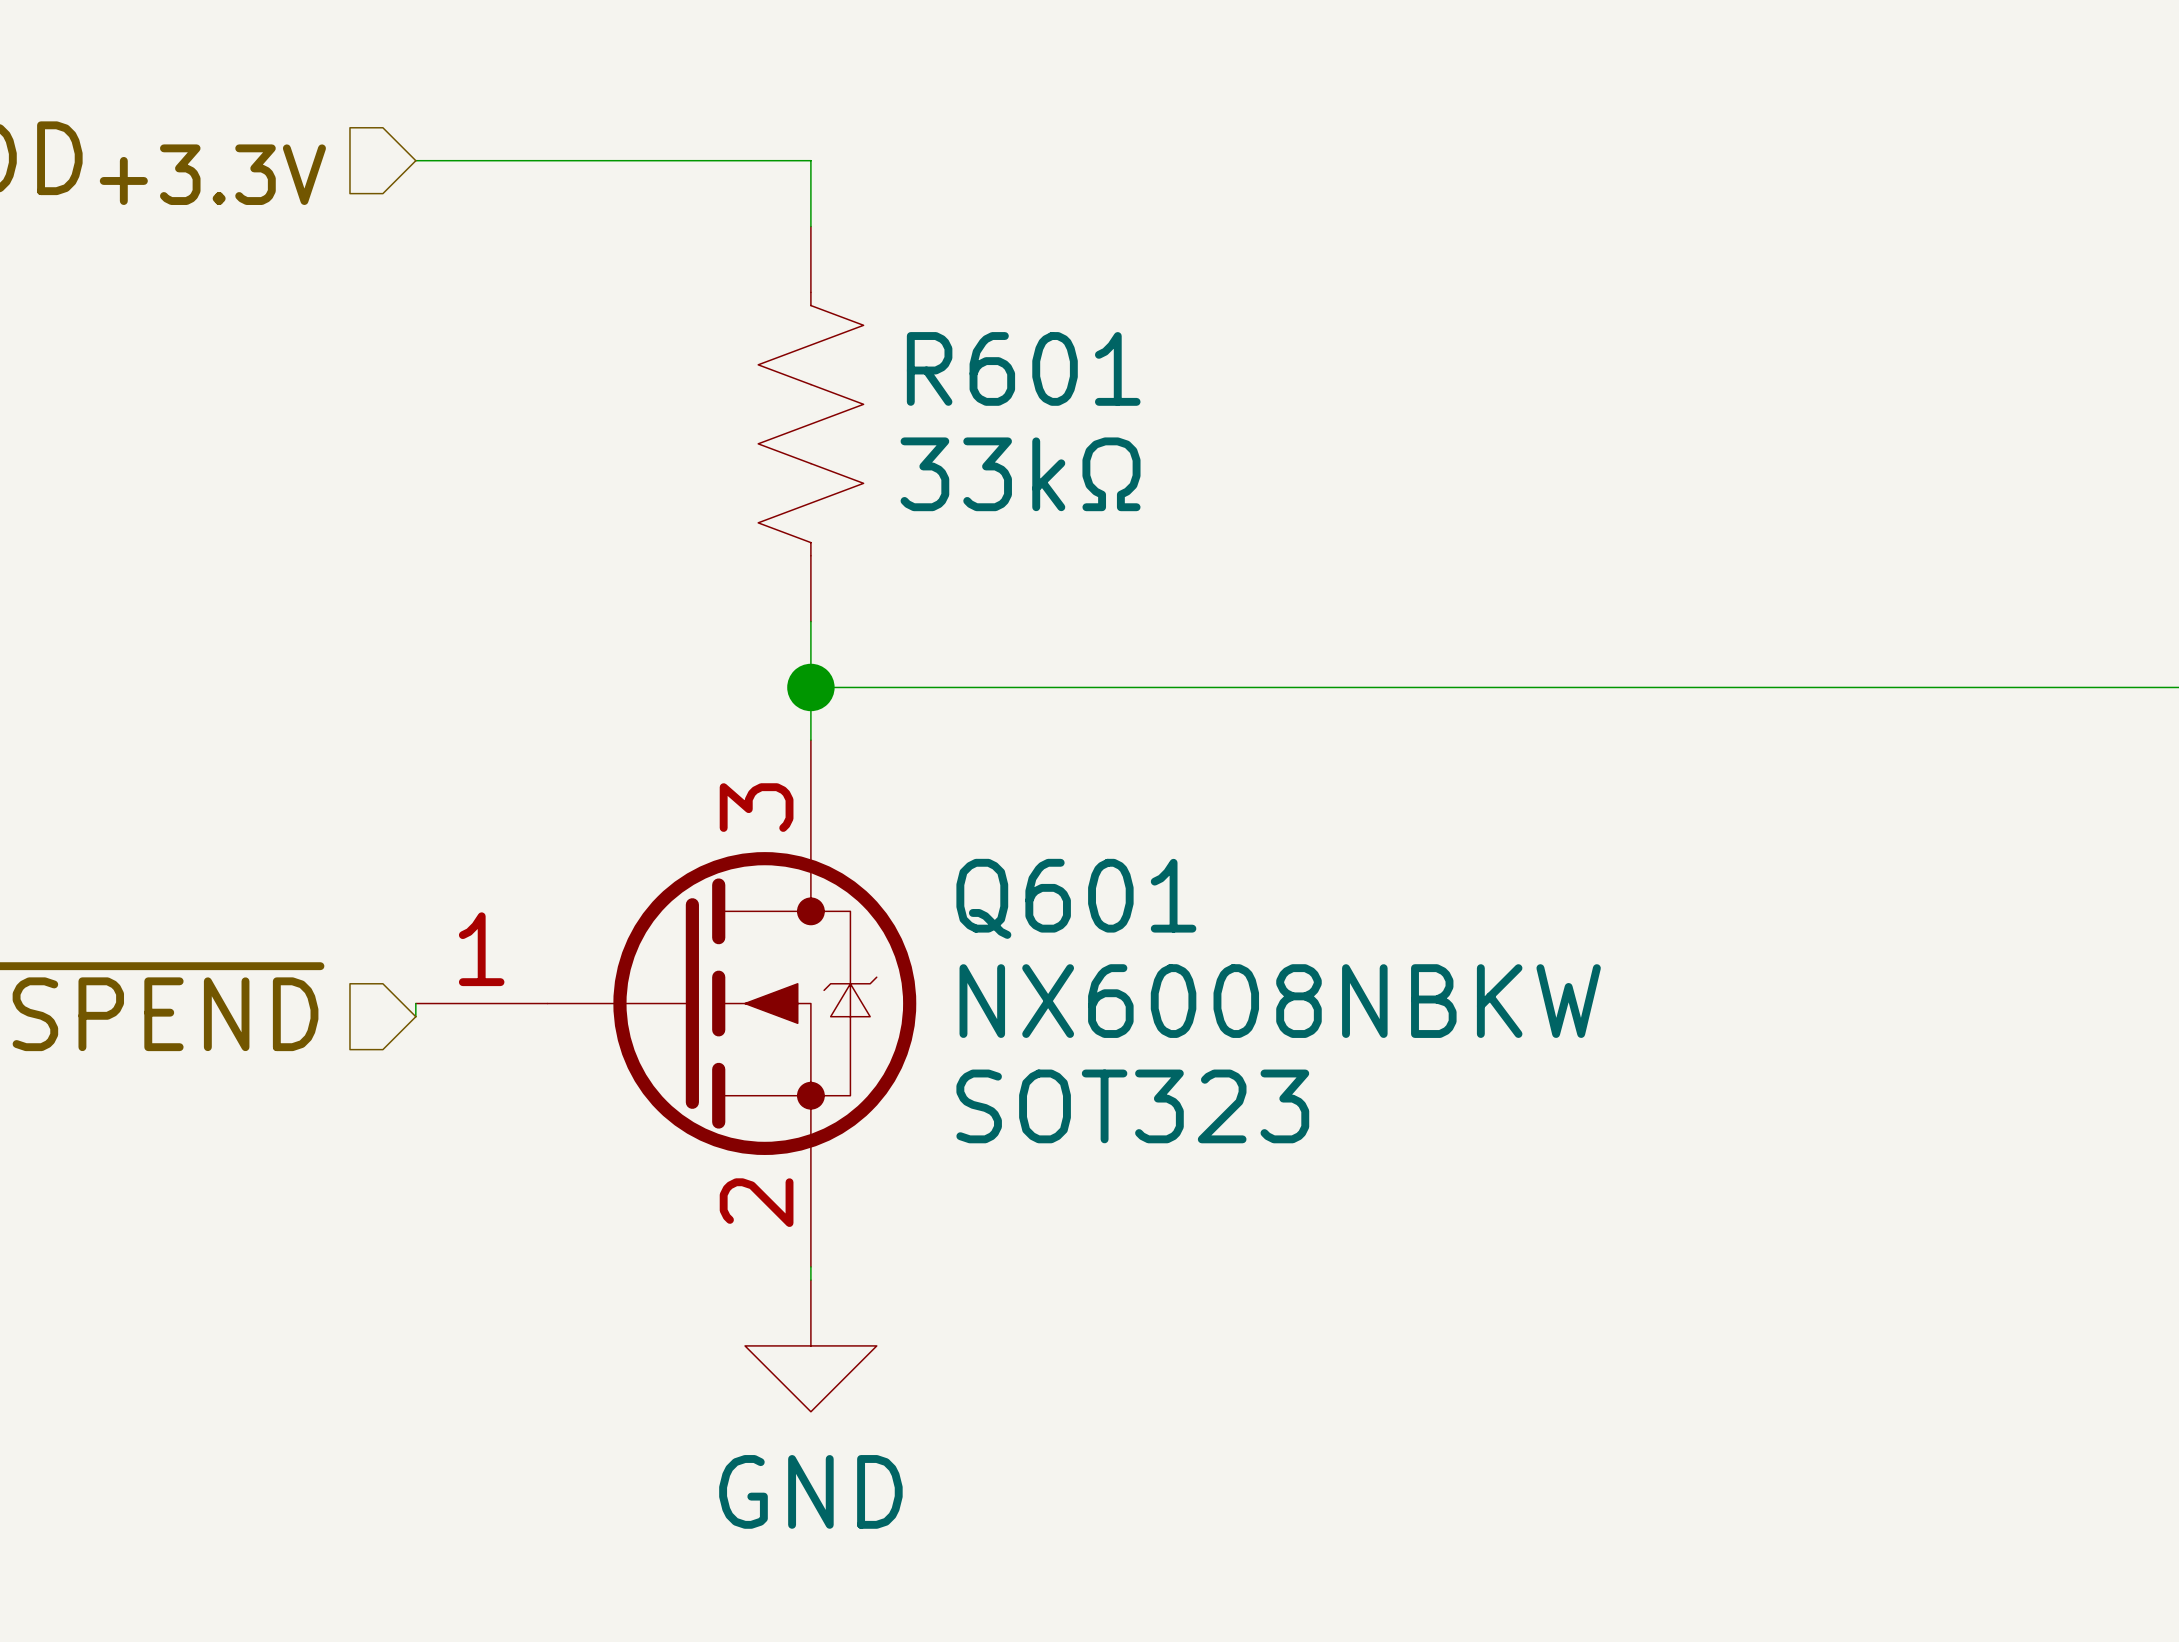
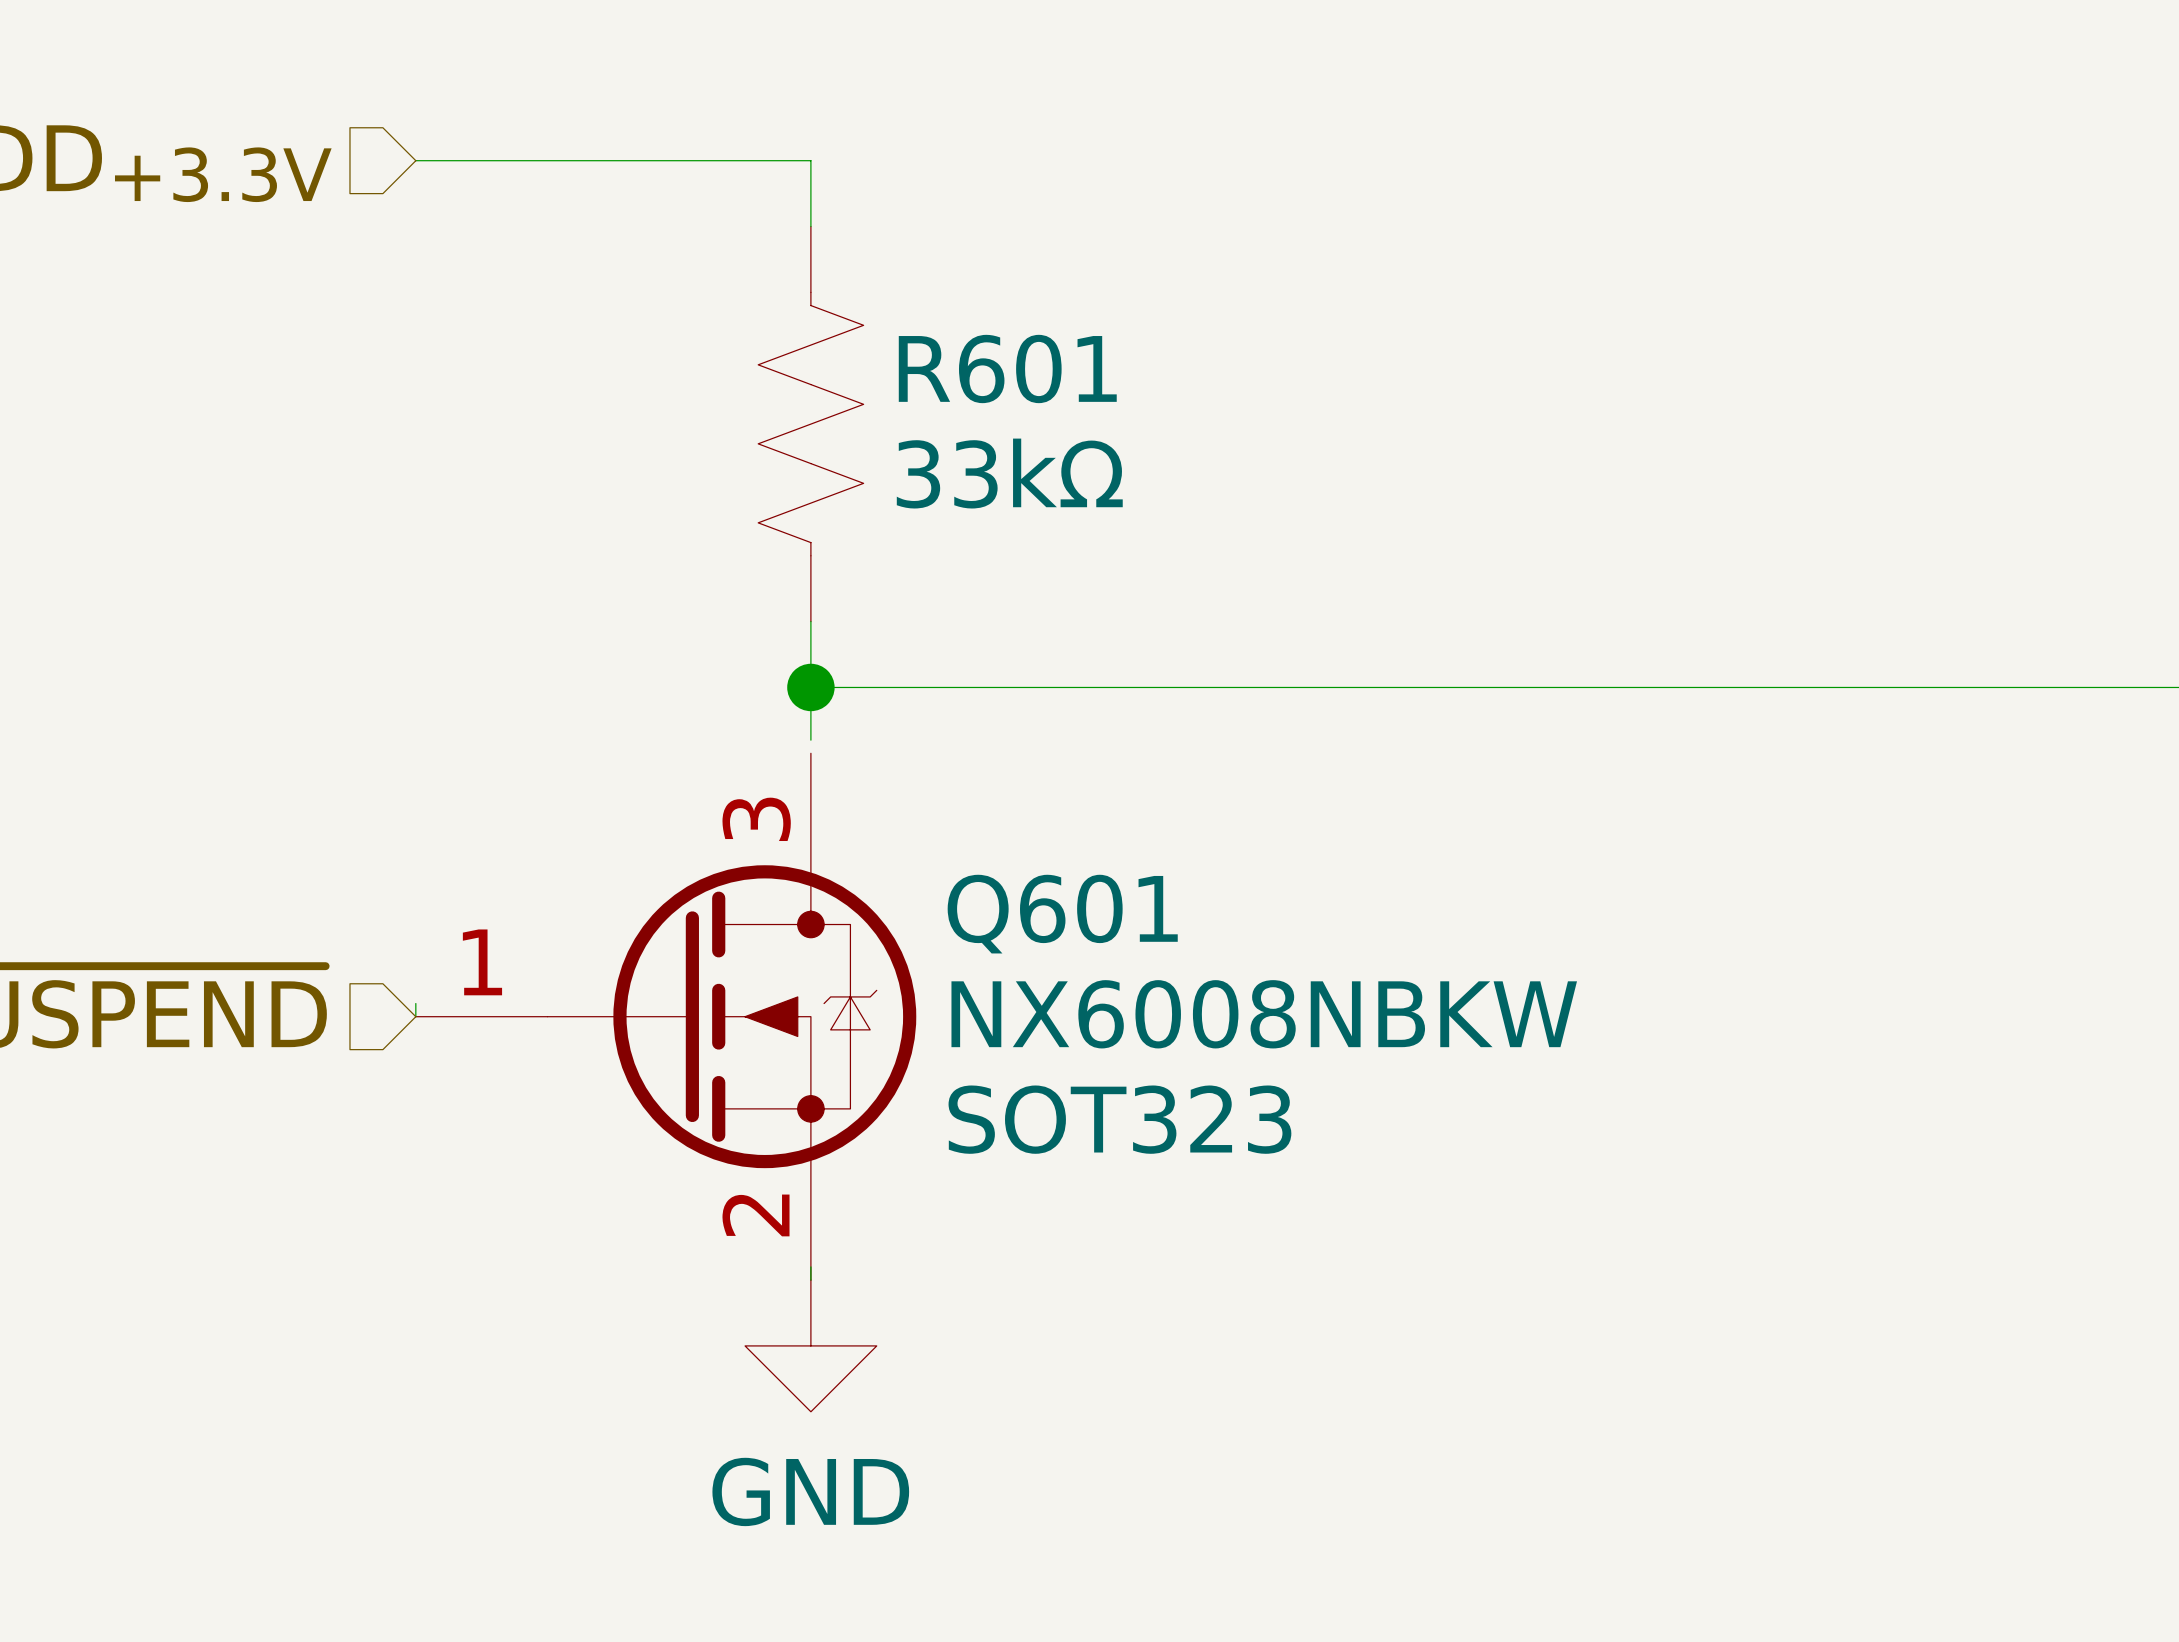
Q601 position: (666, 1003) -> (666, 1016)

